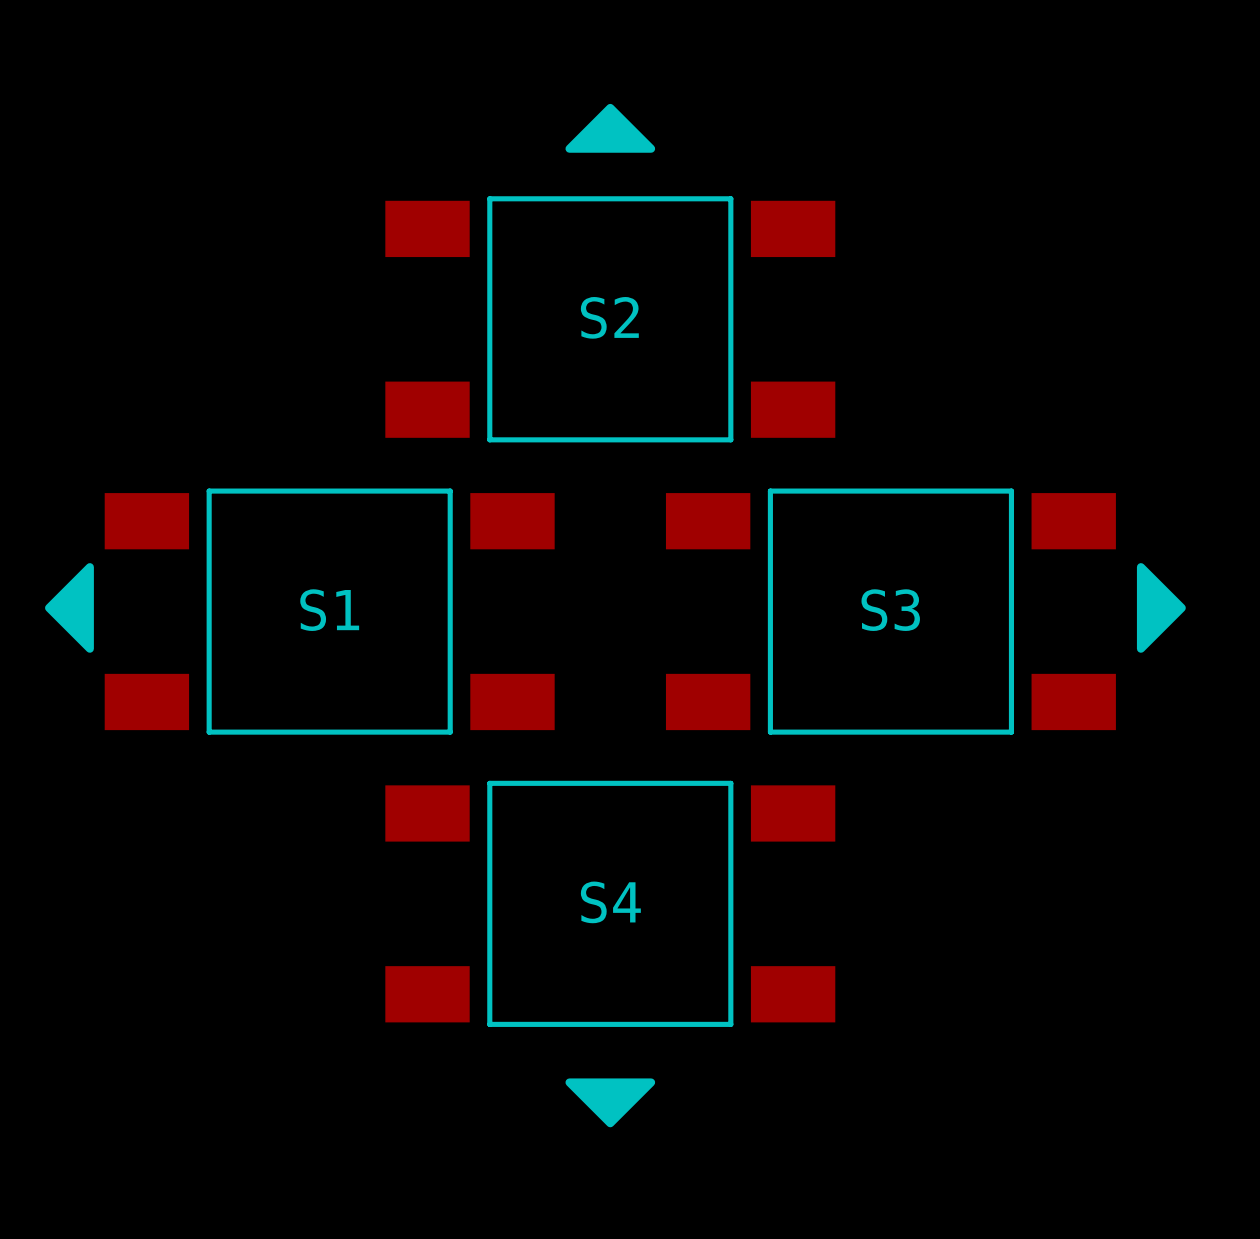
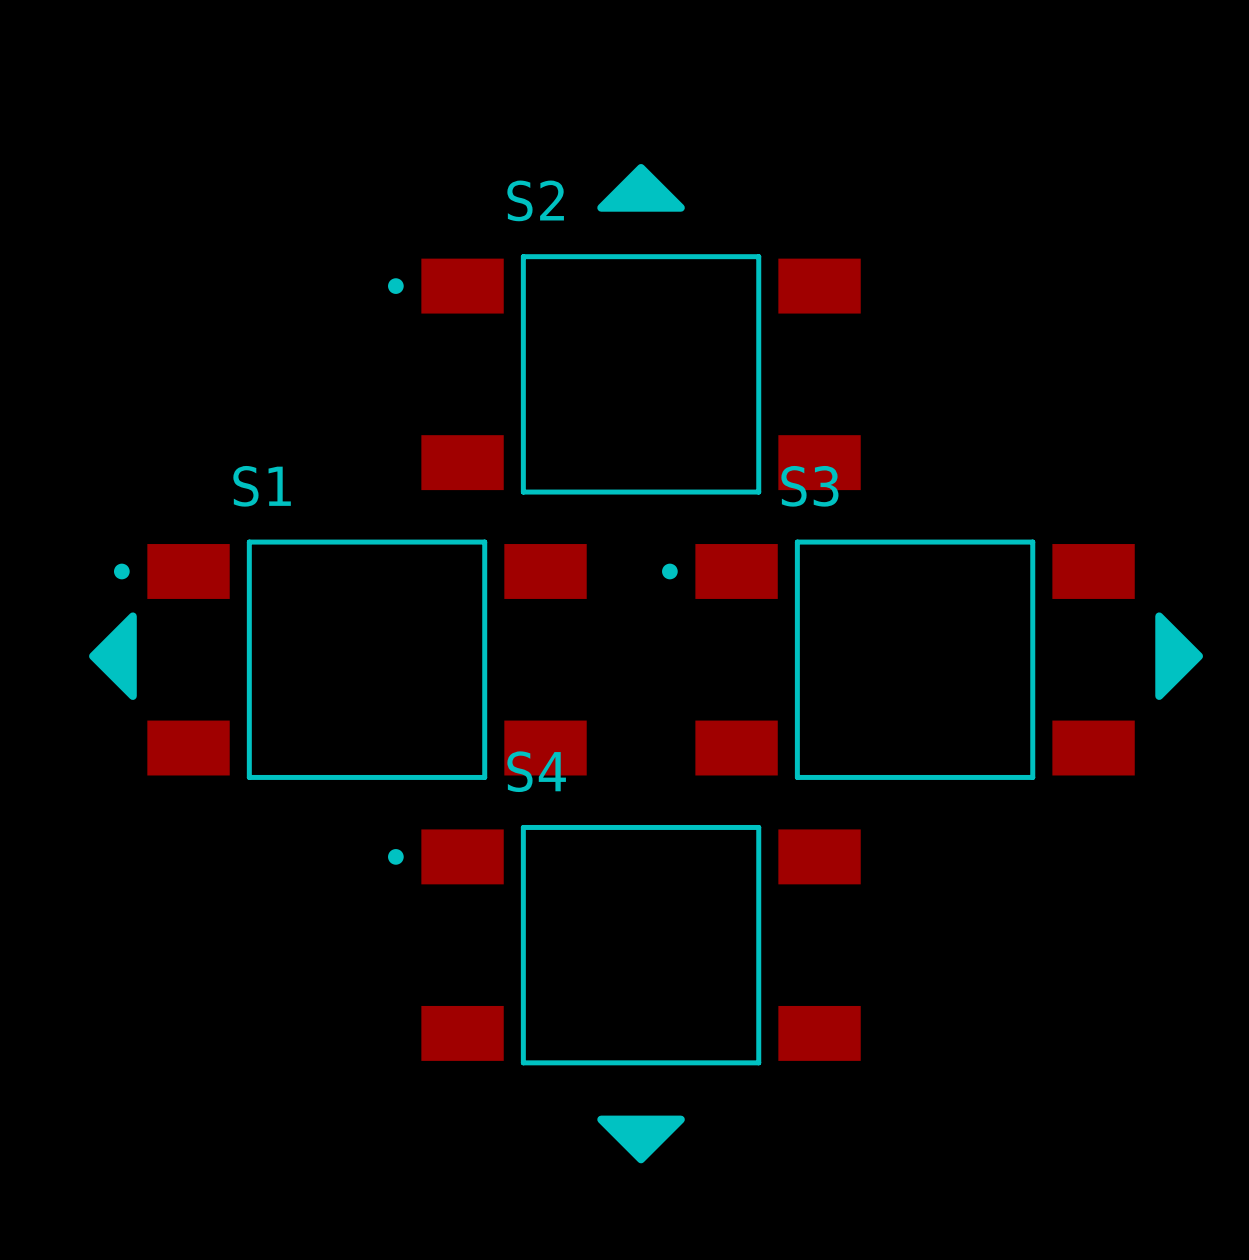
S2 footprint: [385, 196, 836, 443] -> [388, 254, 861, 495]
S2 name position: S2 (609, 317) -> S2 (535, 200)
S1 footprint: [104, 488, 555, 735] -> [113, 539, 587, 780]
S3 footprint: [665, 488, 1116, 735] -> [662, 539, 1135, 780]
S1 name position: S1 (329, 610) -> S1 (262, 486)
S3 name position: S3 (890, 610) -> S3 (809, 486)
S4 footprint: [385, 780, 836, 1027] -> [388, 824, 861, 1066]
S4 name position: S4 (610, 902) -> S4 (536, 771)

